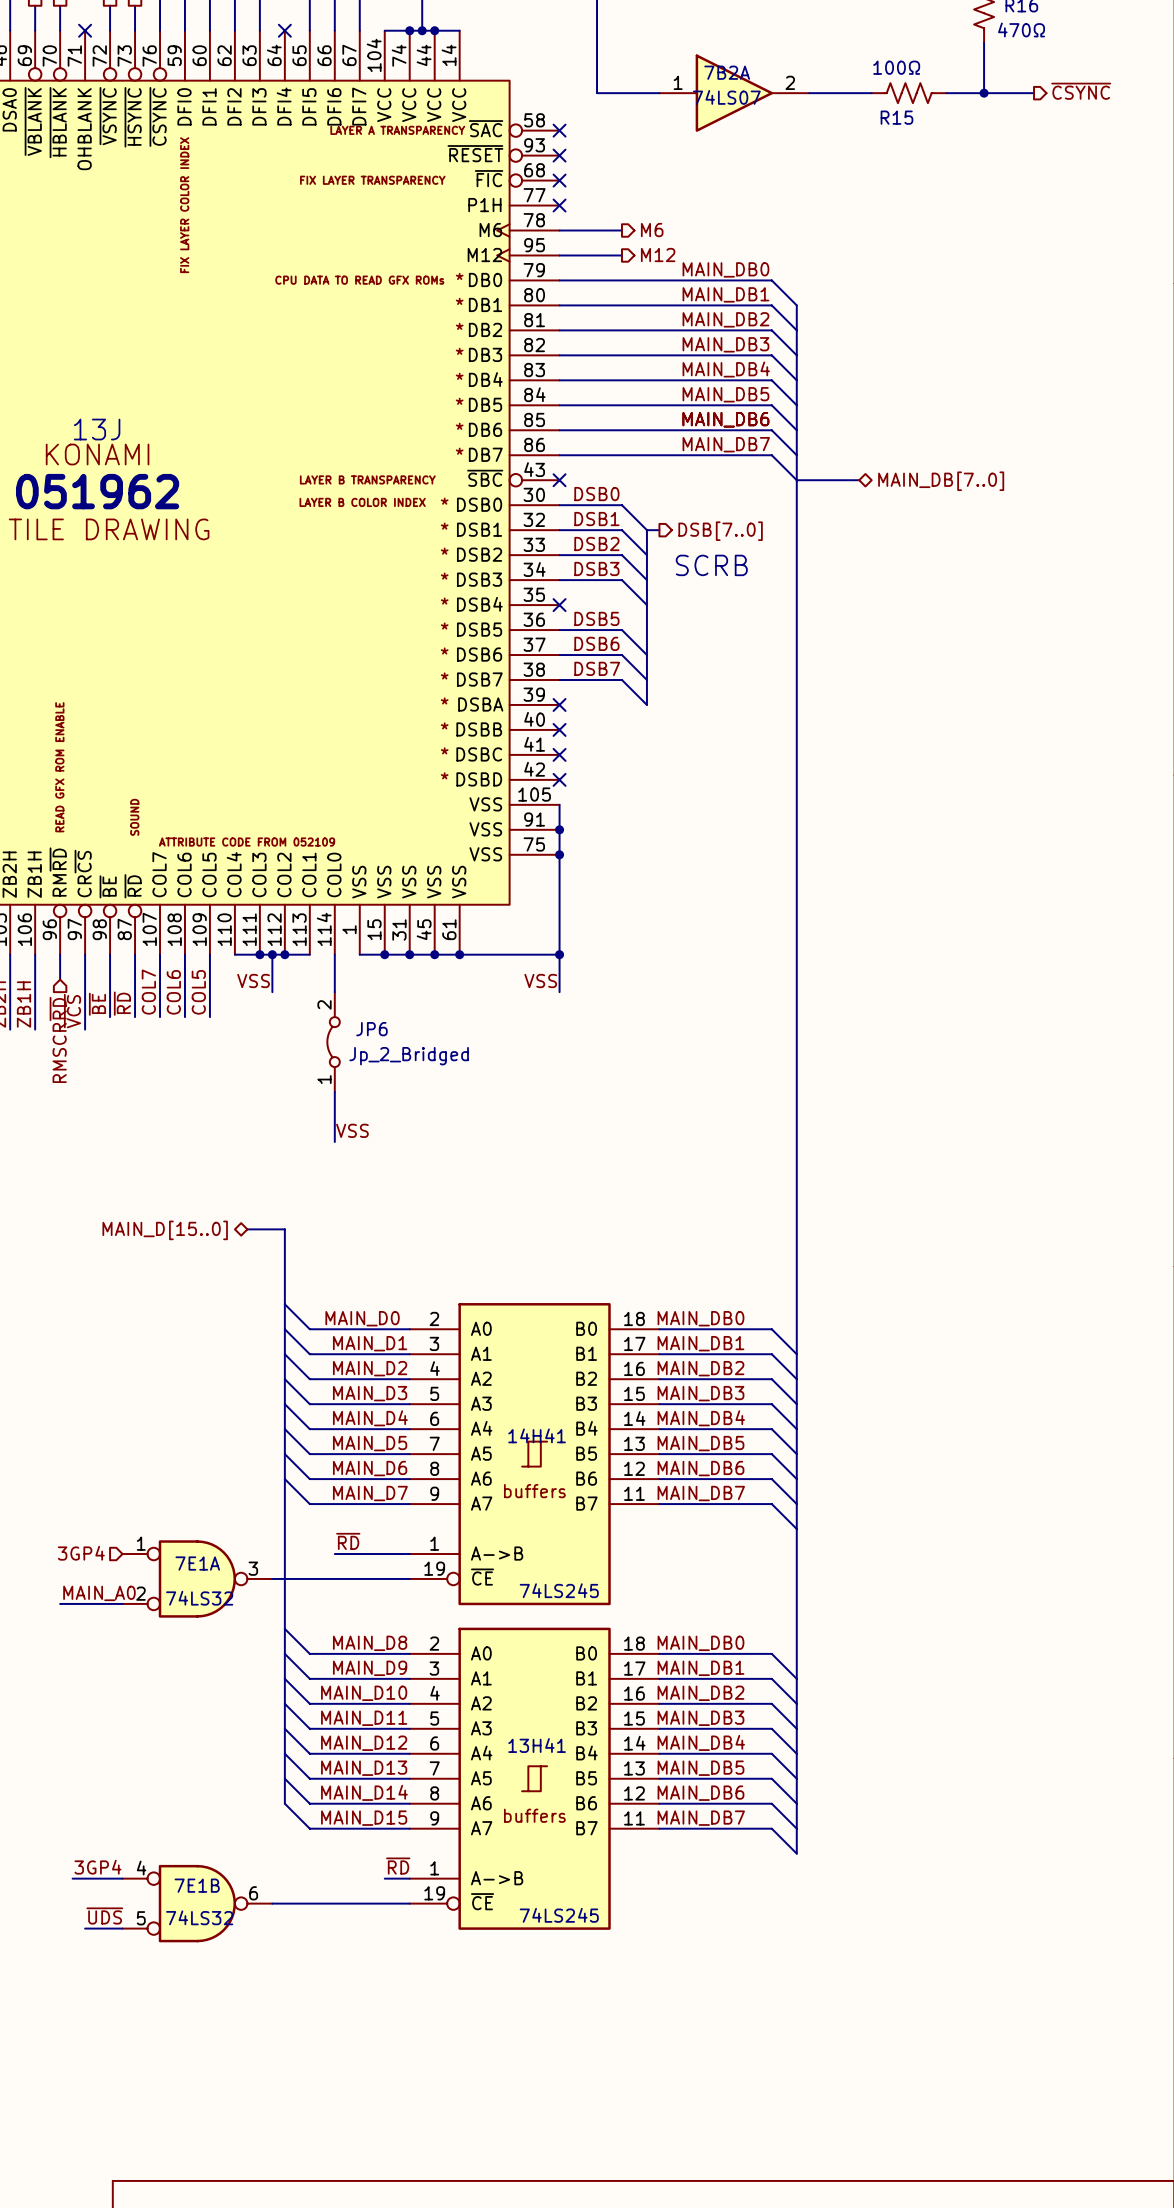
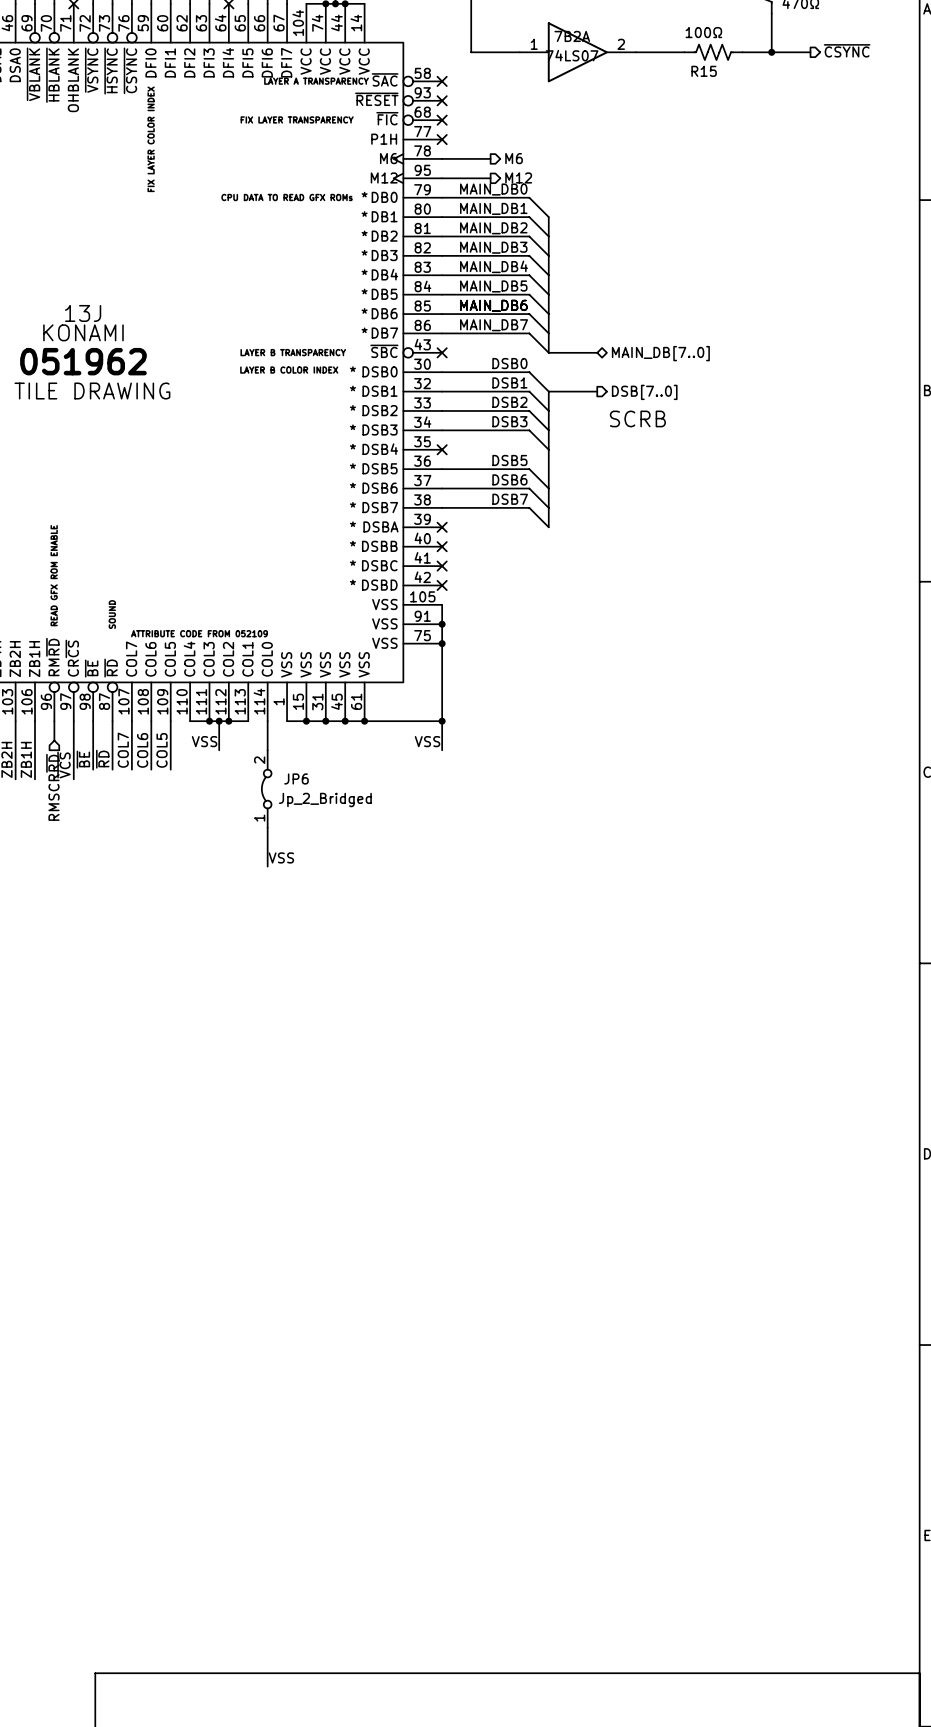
label position: MAIN_DB0 (725, 269) -> MAIN_DB0 (493, 189)
wire: (671, 280) (771, 280) (796, 305) -> (529, 197) (548, 217)
label position: MAIN_DB1 (725, 294) -> MAIN_DB1 (493, 208)
wire: (671, 305) (771, 305) (796, 330) -> (529, 217) (548, 236)
bus: none -> (548, 217) (548, 352) (597, 352)
bus: (796, 305) (796, 1853) -> none
label position: MAIN_DB2 (725, 319) -> MAIN_DB2 (493, 228)
wire: (671, 330) (771, 330) (796, 355) -> (529, 236) (548, 255)
label position: MAIN_DB3 (725, 344) -> MAIN_DB3 (493, 247)
wire: (671, 355) (771, 355) (796, 380) -> (529, 255) (548, 275)
label position: MAIN_DB4 (726, 369) -> MAIN_DB4 (493, 266)
wire: (671, 380) (771, 380) (796, 405) -> (529, 275) (548, 294)
label position: MAIN_DB5 (725, 394) -> MAIN_DB5 (493, 286)
wire: (671, 405) (771, 405) (796, 430) -> (529, 294) (548, 314)
label position: MAIN_DB6 (725, 419) -> MAIN_DB6 (493, 305)
wire: (671, 430) (771, 430) (796, 455) -> (529, 314) (548, 333)
label position: MAIN_DB7 (726, 444) -> MAIN_DB7 (493, 325)
wire: (671, 455) (771, 455) (796, 480) -> (529, 333) (548, 352)
bus: (796, 480) (859, 480) -> none
hierarchical label position: MAIN_DB[7..0] (941, 481) -> MAIN_DB[7..0] (660, 353)
label position: DSB0 (596, 494) -> DSB0 (509, 363)
wire: (621, 505) (646, 530) -> (490, 372) (529, 372) (548, 391)
label position: DSB1 (596, 519) -> DSB1 (509, 382)
wire: (621, 530) (646, 555) -> (490, 391) (529, 391) (548, 410)
bus: (659, 530) (646, 530) (646, 704) -> none
bus: none -> (597, 391) (548, 391) (548, 527)
hierarchical label position: DSB[7..0] (720, 531) -> DSB[7..0] (644, 392)
label position: DSB2 (596, 543) -> DSB2 (509, 402)
wire: (621, 555) (646, 580) -> (490, 410) (529, 410) (548, 430)
text position: SCRB (711, 565) -> SCRB (637, 418)
label position: DSB3 (596, 568) -> DSB3 (509, 421)
wire: (621, 580) (646, 605) -> (490, 430) (529, 430) (548, 449)
label position: DSB5 (596, 618) -> DSB5 (509, 460)
wire: (621, 630) (646, 655) -> (490, 469) (529, 469) (548, 488)
label position: DSB6 (596, 643) -> DSB6 (509, 479)
wire: (621, 655) (646, 679) -> (490, 488) (529, 488) (548, 507)
label position: DSB7 (597, 668) -> DSB7 (510, 499)
wire: (621, 679) (646, 704) -> (490, 507) (529, 507) (548, 527)
bus: (247, 1229) (284, 1229) (284, 1803) -> none
hierarchical label: MAIN_D[15..0] (165, 1230) -> none
wire: (284, 1304) (309, 1329) (409, 1329) -> none
label: MAIN_D0 (362, 1318) -> none
label: MAIN_DB0 (700, 1318) -> none
wire: (284, 1329) (309, 1354) (409, 1354) -> none
wire: (659, 1329) (771, 1329) (796, 1354) -> none
label: MAIN_D1 (370, 1343) -> none
label: MAIN_DB1 (700, 1343) -> none
wire: (284, 1354) (309, 1379) (409, 1379) -> none
wire: (659, 1354) (771, 1354) (796, 1379) -> none
label: MAIN_D2 (370, 1368) -> none
label: MAIN_DB2 (700, 1368) -> none
wire: (284, 1379) (309, 1404) (409, 1404) -> none
wire: (659, 1379) (771, 1379) (796, 1404) -> none
label: MAIN_D3 (370, 1393) -> none
label: MAIN_DB3 (700, 1393) -> none
wire: (284, 1404) (309, 1429) (409, 1429) -> none
wire: (659, 1404) (771, 1404) (796, 1429) -> none
label: MAIN_D4 (370, 1418) -> none
label: MAIN_DB4 (701, 1418) -> none
wire: (284, 1429) (309, 1454) (409, 1454) -> none
wire: (659, 1429) (771, 1429) (796, 1454) -> none
label: MAIN_D5 (370, 1443) -> none
label: MAIN_DB5 (700, 1443) -> none
wire: (284, 1454) (309, 1479) (409, 1479) -> none
14H41: 74LS245 (534, 1454) -> none
wire: (659, 1454) (771, 1454) (796, 1479) -> none
label: MAIN_D6 (370, 1468) -> none
label: MAIN_DB6 (700, 1468) -> none
wire: (284, 1479) (309, 1504) (409, 1504) -> none
wire: (659, 1479) (771, 1479) (796, 1504) -> none
label: MAIN_D7 (370, 1493) -> none
label: MAIN_DB7 (701, 1493) -> none
wire: (659, 1504) (771, 1504) (796, 1529) -> none
label: ~{RD} (348, 1541) -> none
hierarchical label: 3GP4 (81, 1553) -> none
wire: (334, 1554) (409, 1554) -> none
7E1A: 74LS32 (197, 1578) -> none
wire: (272, 1578) (409, 1578) -> none
label: MAIN_A0 (99, 1593) -> none
wire: (60, 1603) (122, 1603) -> none
wire: (284, 1628) (309, 1653) (409, 1653) -> none
label: MAIN_D8 (370, 1643) -> none
label: MAIN_DB0 (700, 1643) -> none
wire: (284, 1653) (309, 1678) (409, 1678) -> none
wire: (659, 1653) (771, 1653) (796, 1678) -> none
label: MAIN_D9 (370, 1668) -> none
label: MAIN_DB1 (700, 1668) -> none
wire: (284, 1678) (309, 1703) (409, 1703) -> none
wire: (659, 1678) (771, 1678) (796, 1703) -> none
label: MAIN_D10 (364, 1693) -> none
label: MAIN_DB2 (700, 1693) -> none
wire: (284, 1703) (309, 1728) (409, 1728) -> none
wire: (659, 1703) (771, 1703) (796, 1728) -> none
label: MAIN_D11 (364, 1718) -> none
label: MAIN_DB3 (700, 1718) -> none
wire: (284, 1728) (309, 1753) (409, 1753) -> none
wire: (659, 1728) (771, 1728) (796, 1753) -> none
label: MAIN_DB4 (701, 1742) -> none
label: MAIN_D12 (364, 1743) -> none
wire: (284, 1753) (309, 1778) (409, 1778) -> none
wire: (659, 1753) (771, 1753) (796, 1778) -> none
label: MAIN_D13 (364, 1768) -> none
label: MAIN_DB5 (700, 1768) -> none
wire: (284, 1778) (309, 1803) (409, 1803) -> none
13H41: 74LS245 (534, 1778) -> none
wire: (659, 1778) (771, 1778) (796, 1803) -> none
label: MAIN_D14 (364, 1792) -> none
label: MAIN_DB6 (700, 1793) -> none
wire: (284, 1803) (309, 1828) (409, 1828) -> none
wire: (659, 1803) (771, 1803) (796, 1828) -> none
label: MAIN_D15 (364, 1818) -> none
label: MAIN_DB7 (701, 1818) -> none
wire: (659, 1828) (771, 1828) (796, 1853) -> none
label: ~{RD} (398, 1866) -> none
label: 3GP4 (97, 1867) -> none
wire: (72, 1878) (122, 1878) -> none
wire: (384, 1878) (409, 1878) -> none
7E1B: 74LS32 (197, 1903) -> none
wire: (272, 1903) (409, 1903) -> none
label: ~{UDS} (104, 1916) -> none
wire: (85, 1928) (122, 1928) -> none

